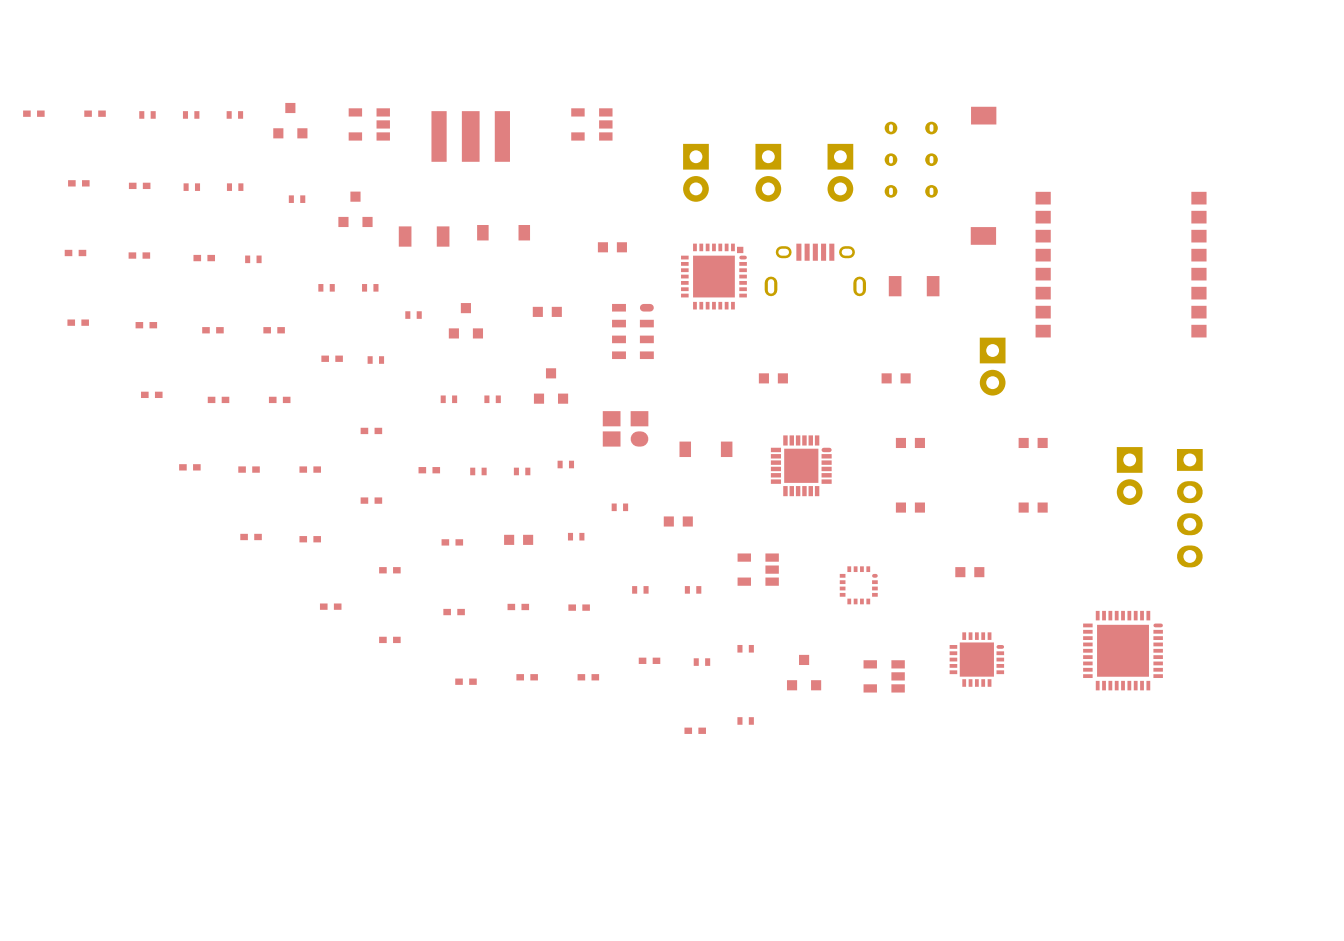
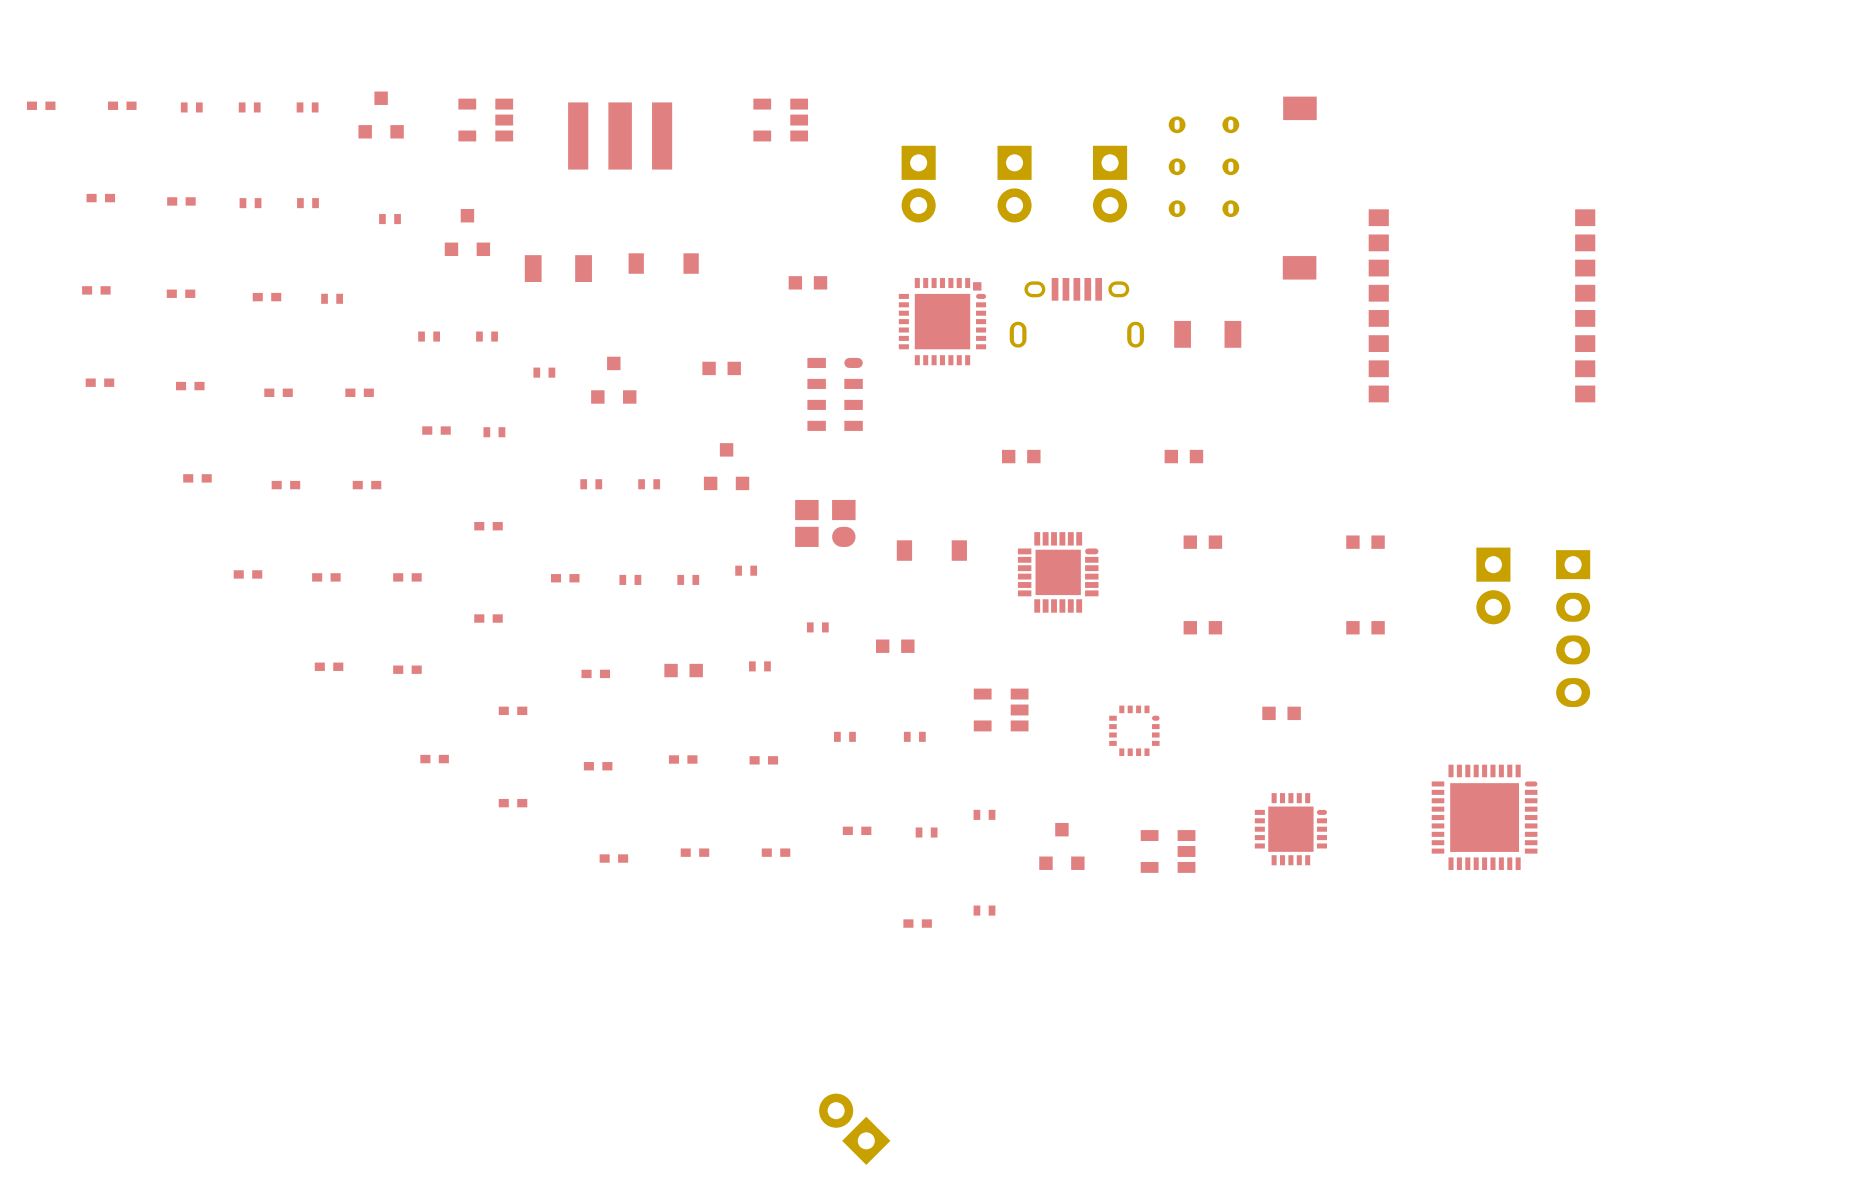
part: (992, 366) -> none
part: none -> (854, 1129)

